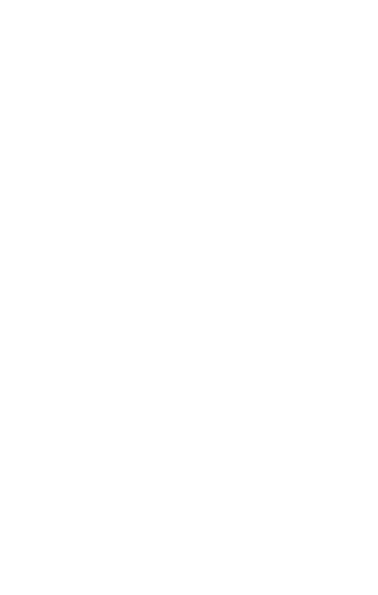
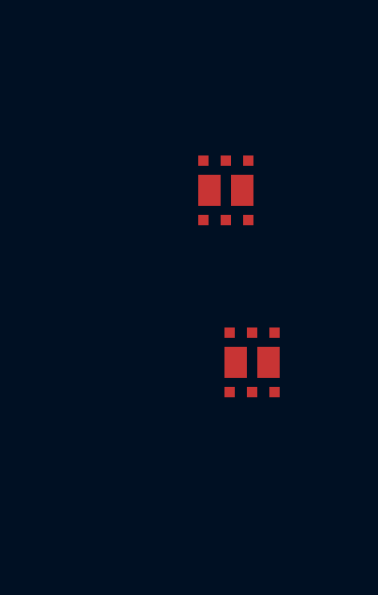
part: none -> (225, 190)
part: none -> (252, 362)

